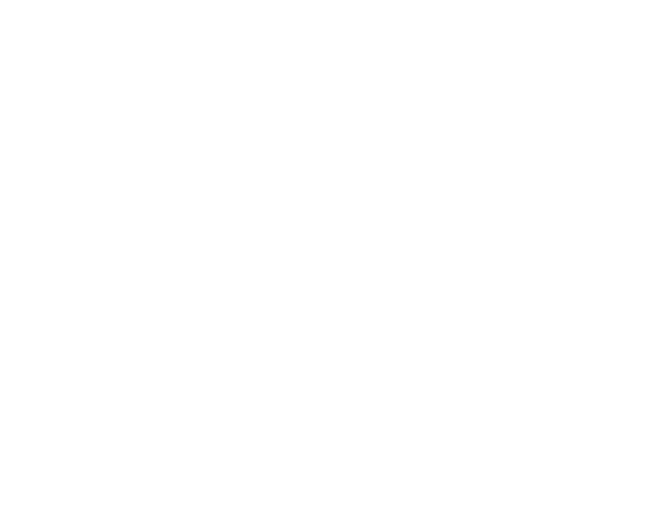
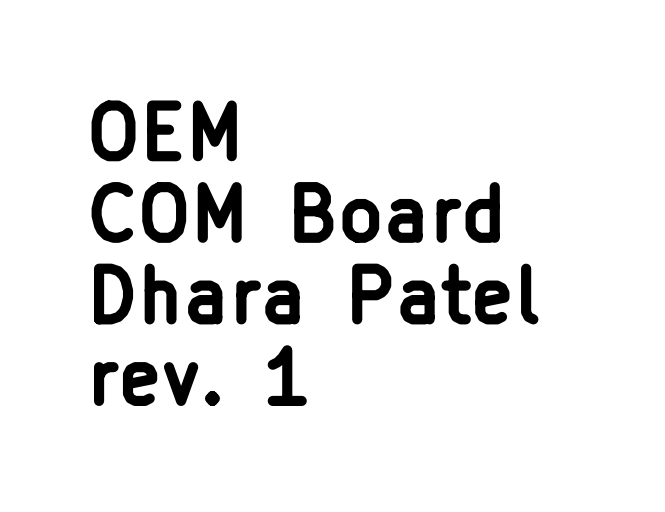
text: none -> OEM (164, 130)
text: none -> COM Board (295, 212)
text: none -> Dhara Patel (316, 294)
text: none -> rev. 1 (200, 375)

